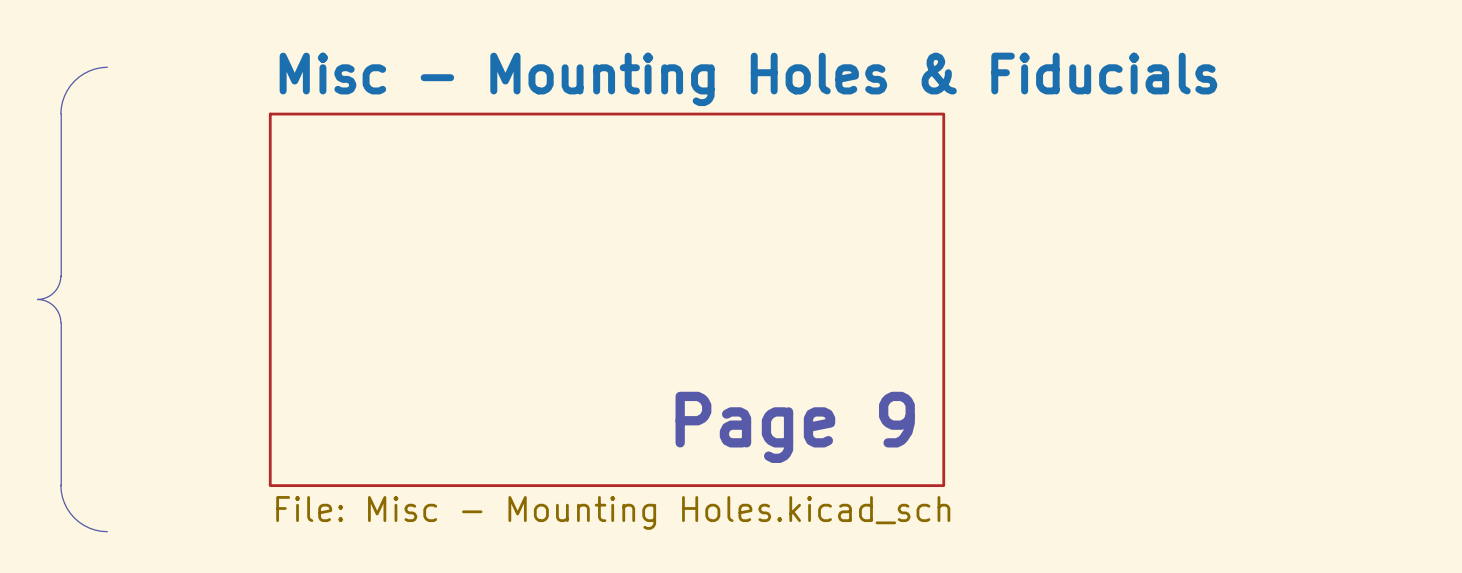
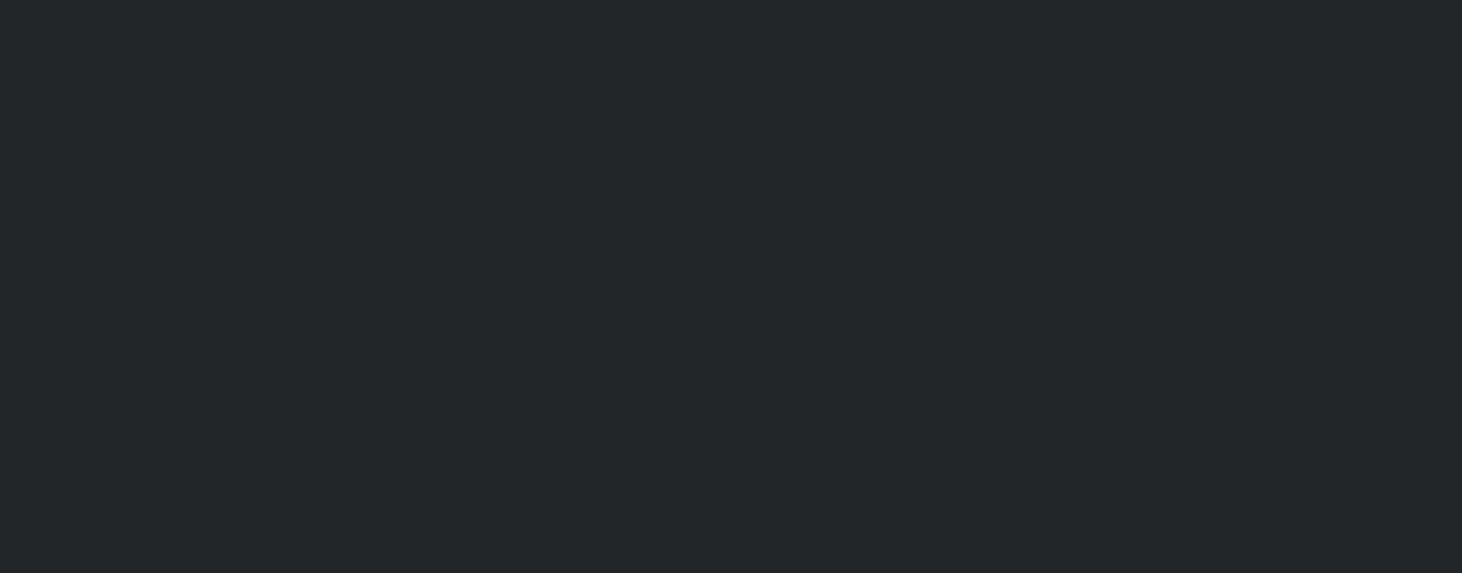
line: (107, 67) (89, 70) (74, 80) (64, 95) (60, 113) -> none
line: (61, 114) (61, 276) -> none
line: (60, 276) (59, 285) (53, 292) (46, 297) (37, 299) (46, 301) (54, 306) (59, 313) (60, 322) -> none
sheet Misc - Mounting Holes & Fiducials: File: Misc - Mounting Holes.kicad_sch (607, 299) -> none
line: (61, 323) (61, 485) -> none
text: Page 9 (795, 427) -> none
line: (60, 485) (64, 503) (74, 518) (89, 528) (107, 531) -> none

